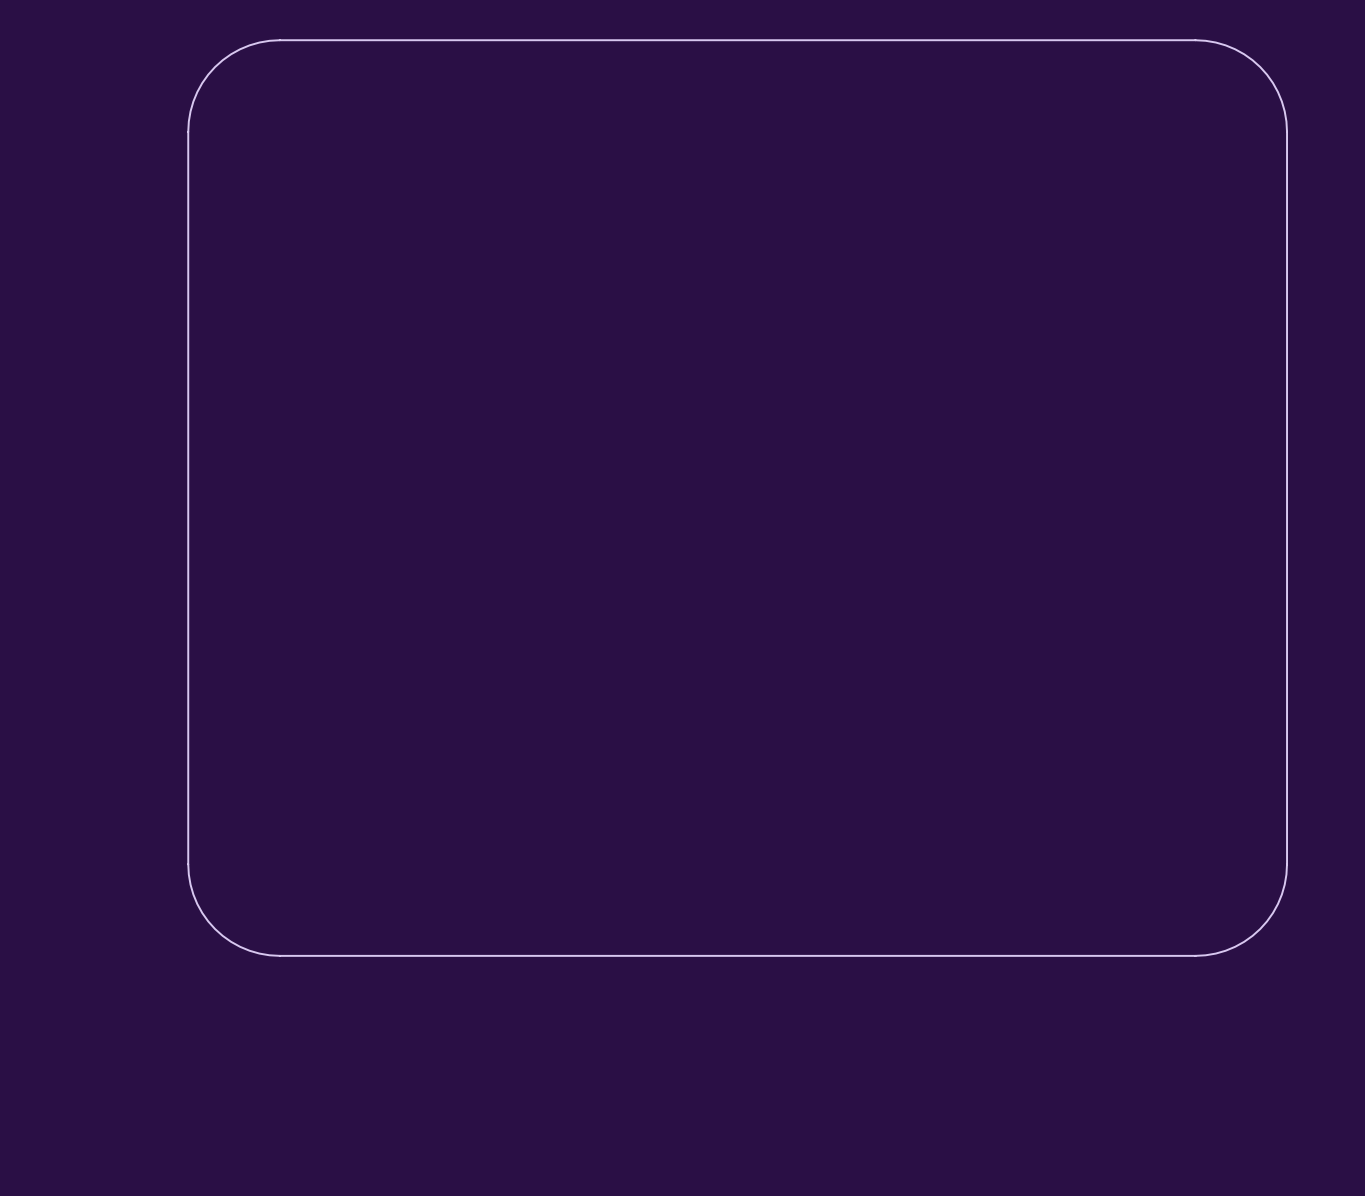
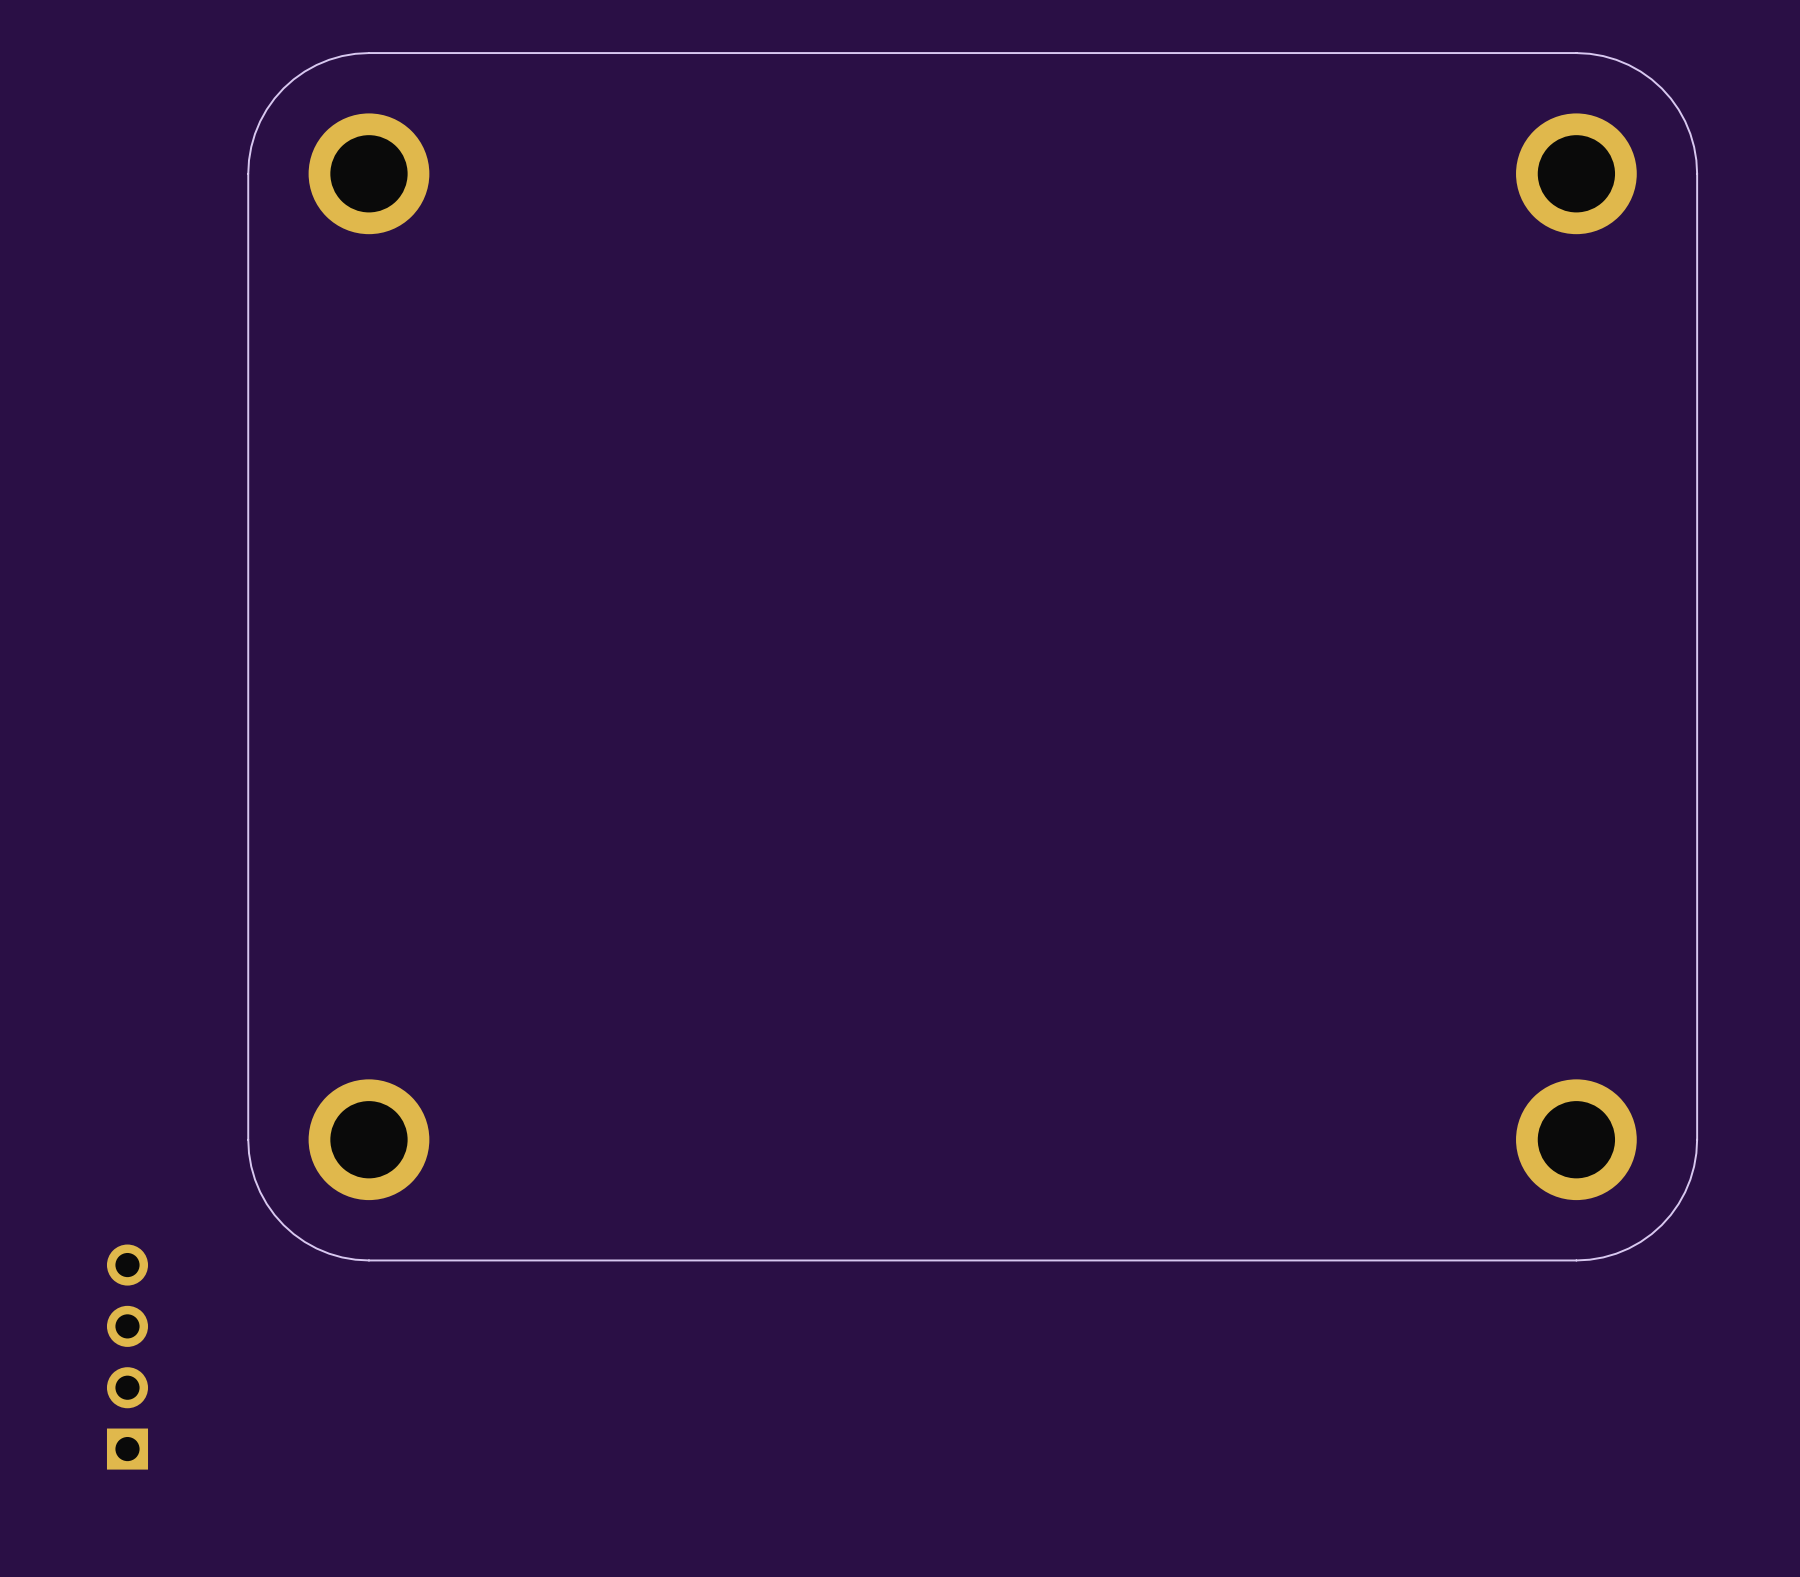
part: none -> (368, 173)
part: none -> (1576, 173)
part: none -> (368, 1139)
part: none -> (1576, 1139)
part: none -> (127, 1357)

